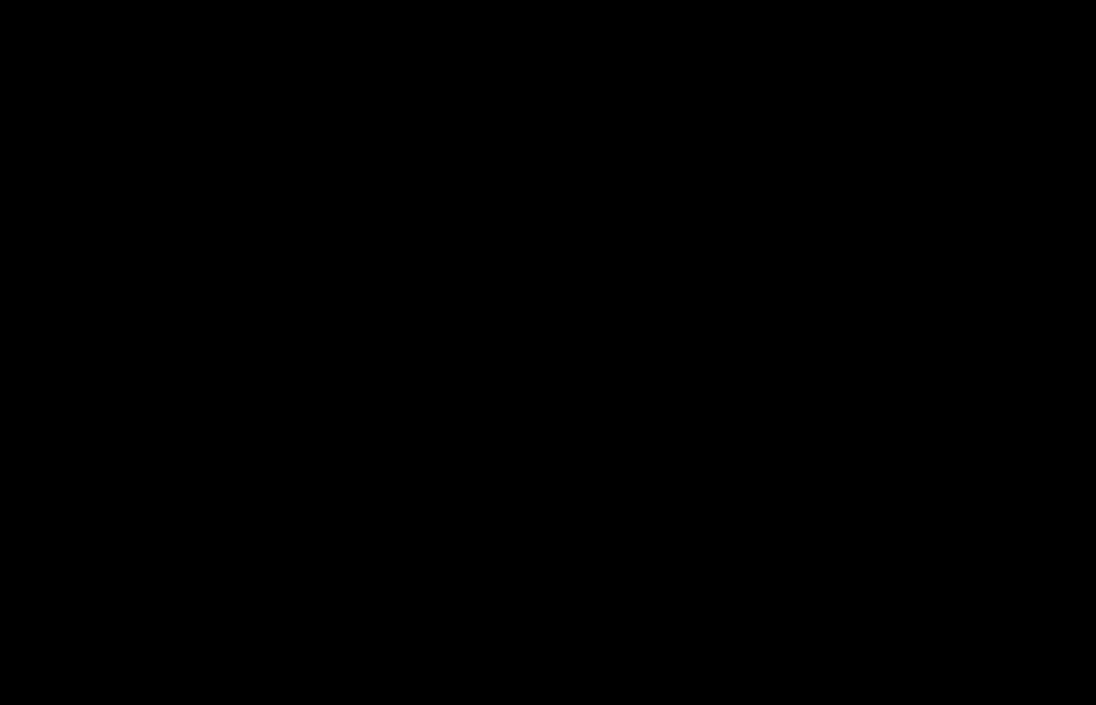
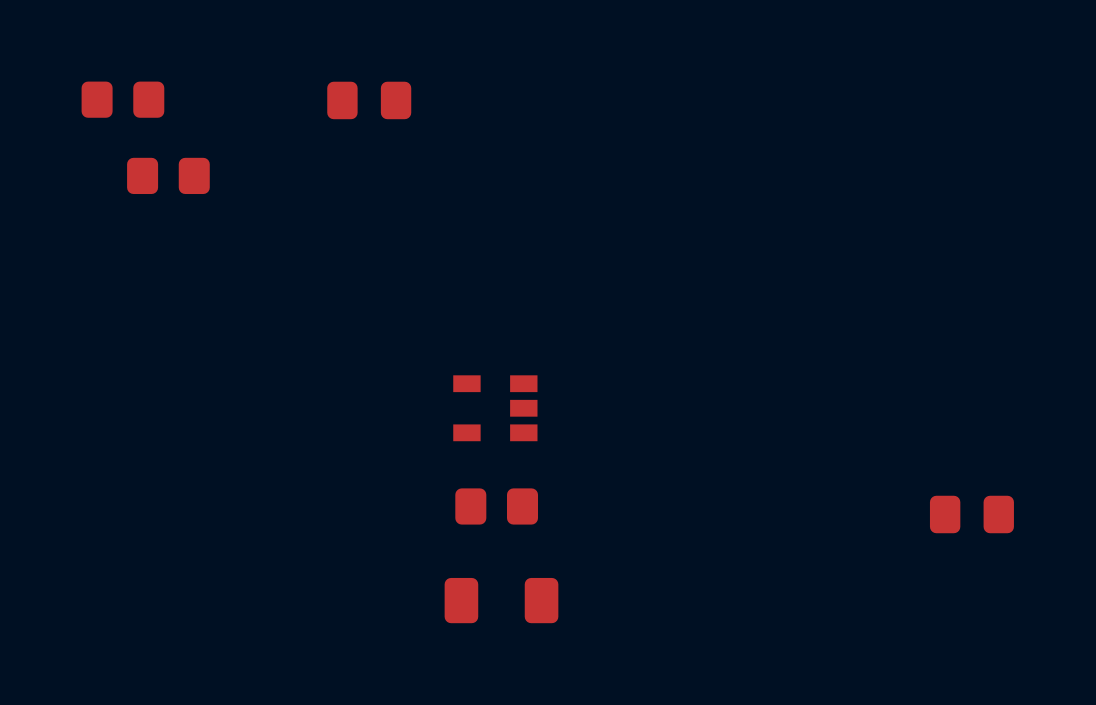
part: none -> (122, 99)
part: none -> (369, 100)
part: none -> (168, 175)
part: none -> (495, 408)
part: none -> (496, 506)
part: none -> (971, 514)
part: none -> (501, 600)

